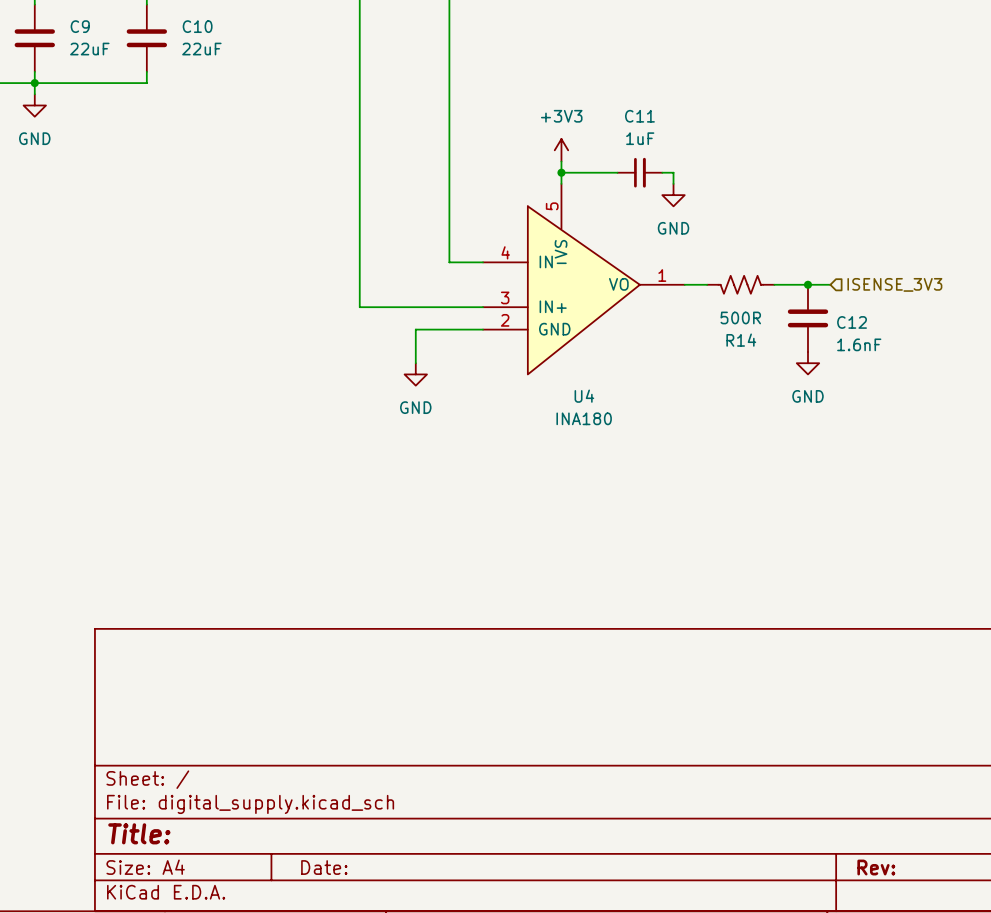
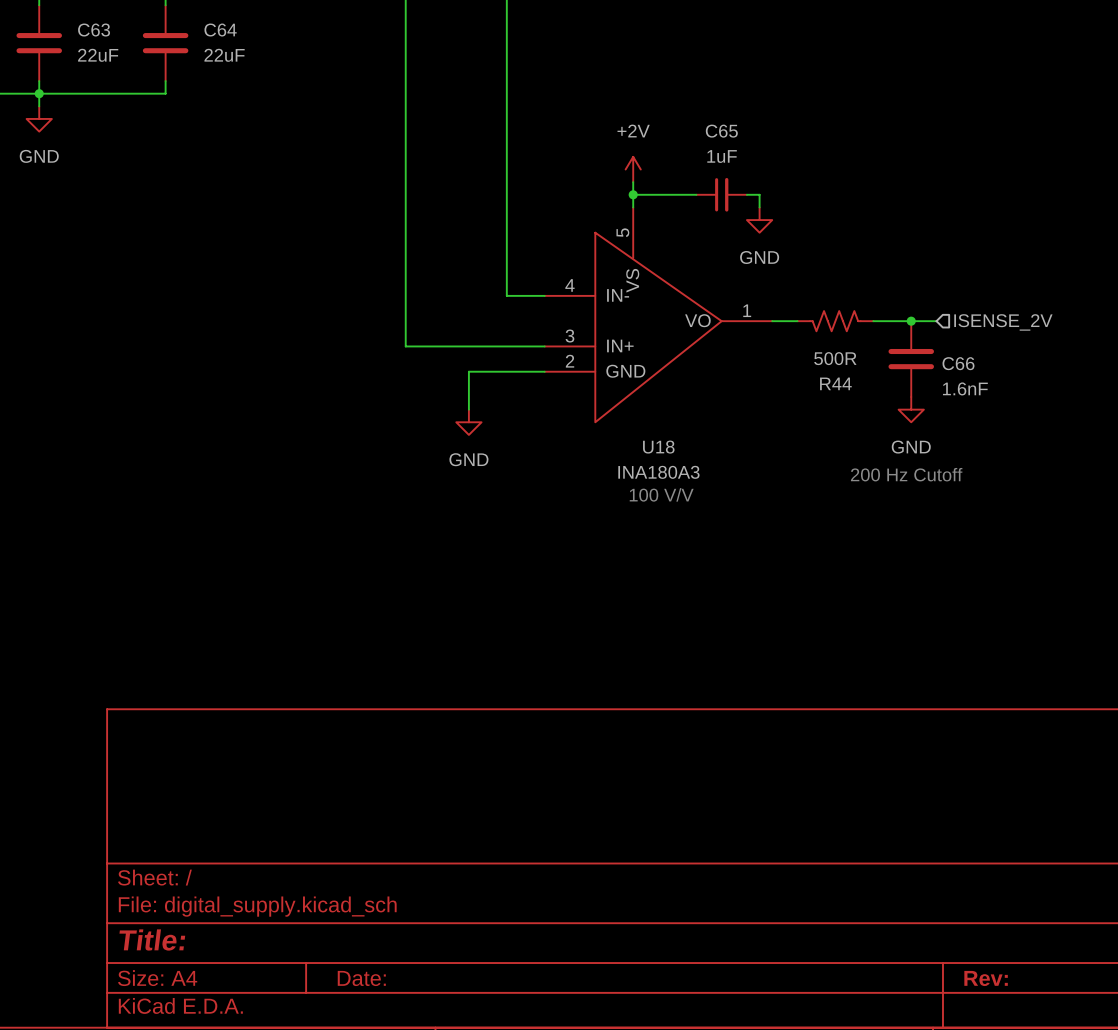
C9 name: C9 (80, 26) -> C63 (94, 30)
C10 name: C10 (197, 26) -> C64 (220, 30)
C11 name: C11 (639, 116) -> C65 (721, 131)
power symbol: +3V3 (561, 150) -> +2V (633, 169)
hierarchical label: ISENSE_3V3 (894, 284) -> ISENSE_2V (1003, 322)
C12 name: C12 (852, 322) -> C66 (958, 363)
R14 name: R14 (741, 340) -> R44 (835, 383)
U4 name: U4 (584, 396) -> U18 (658, 447)
U4 value: INA180 (584, 418) -> INA180A3 (658, 472)
text: none -> 200 Hz Cutoff (906, 474)
text: none -> 100 V/V (661, 494)

